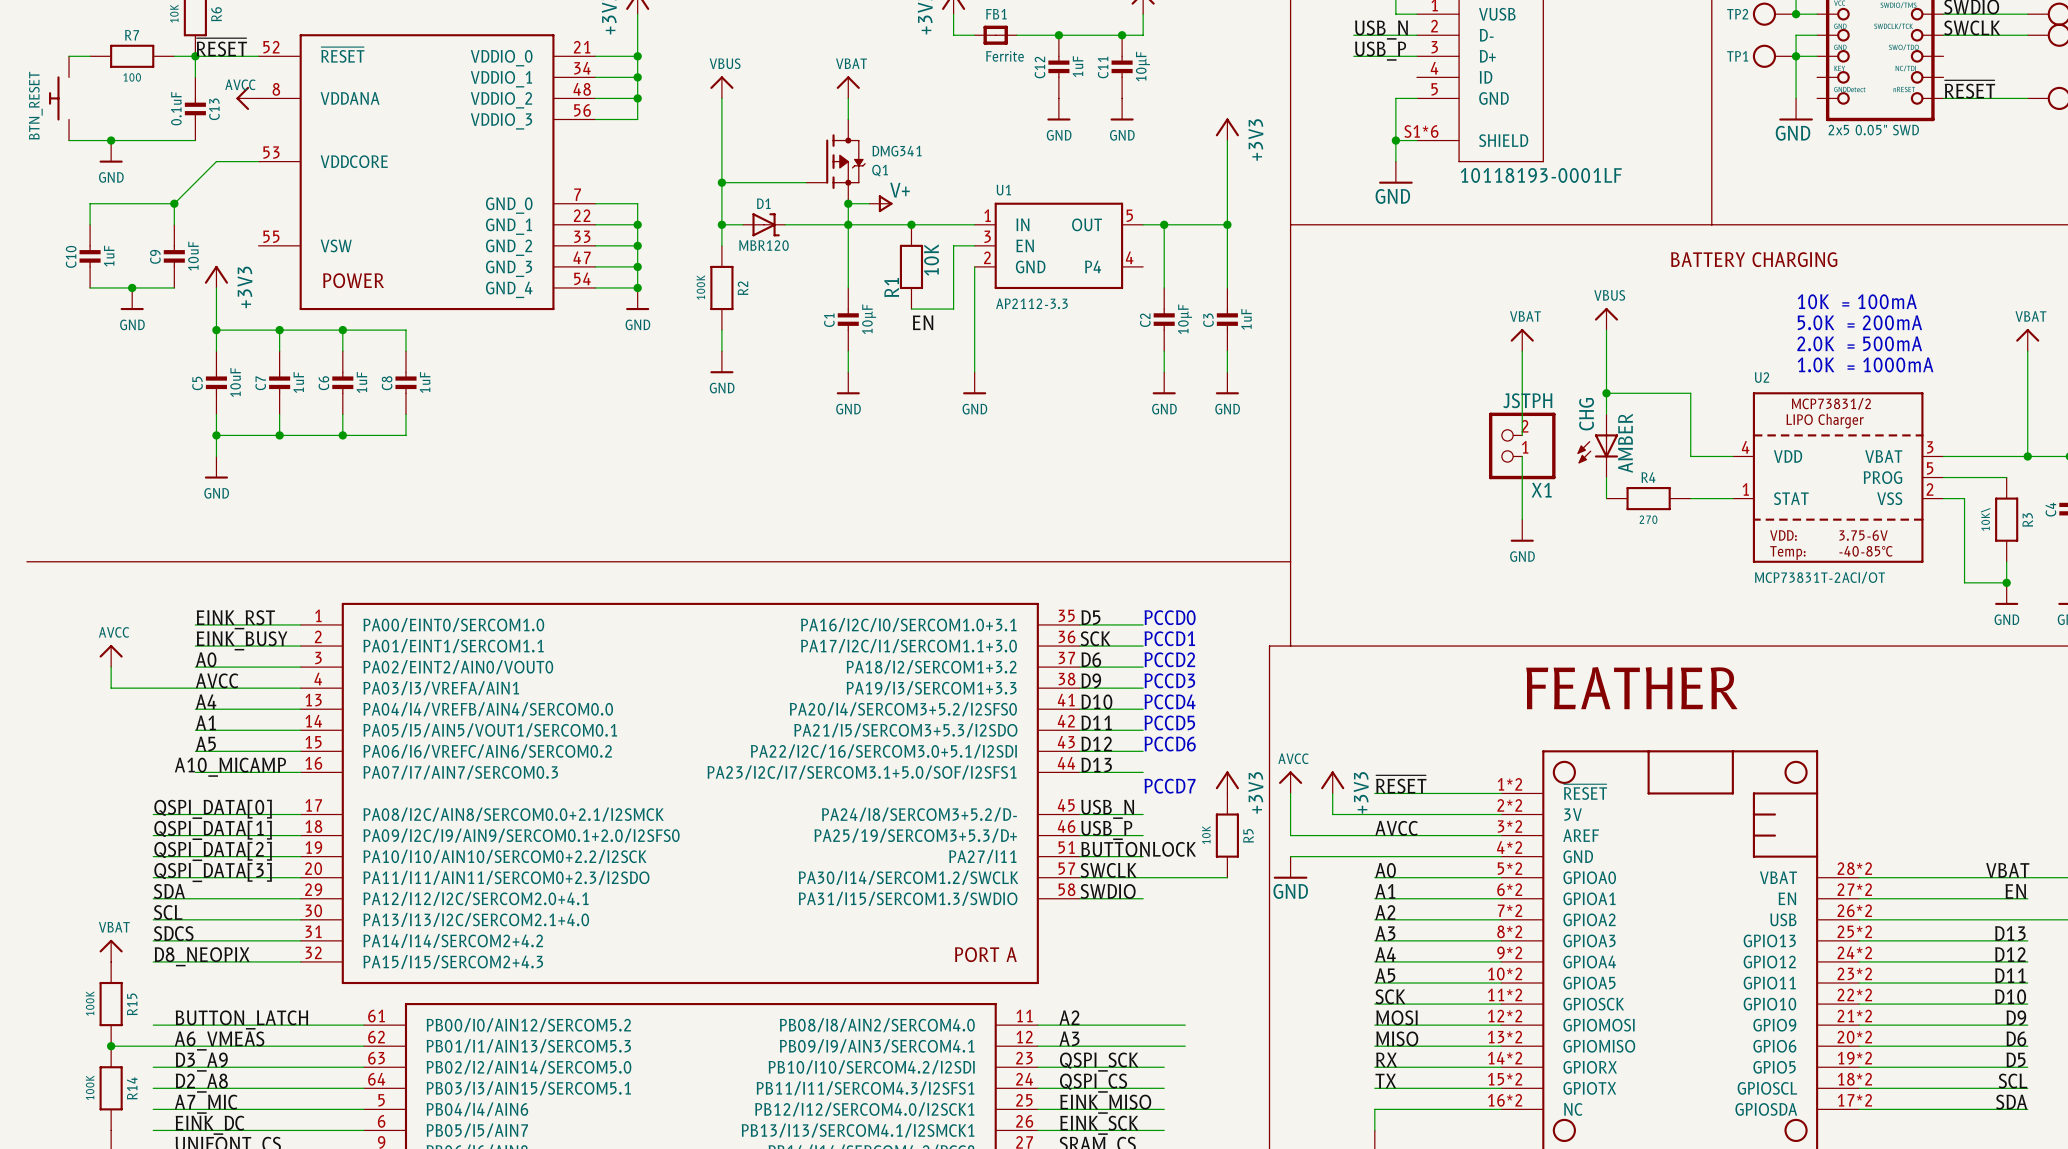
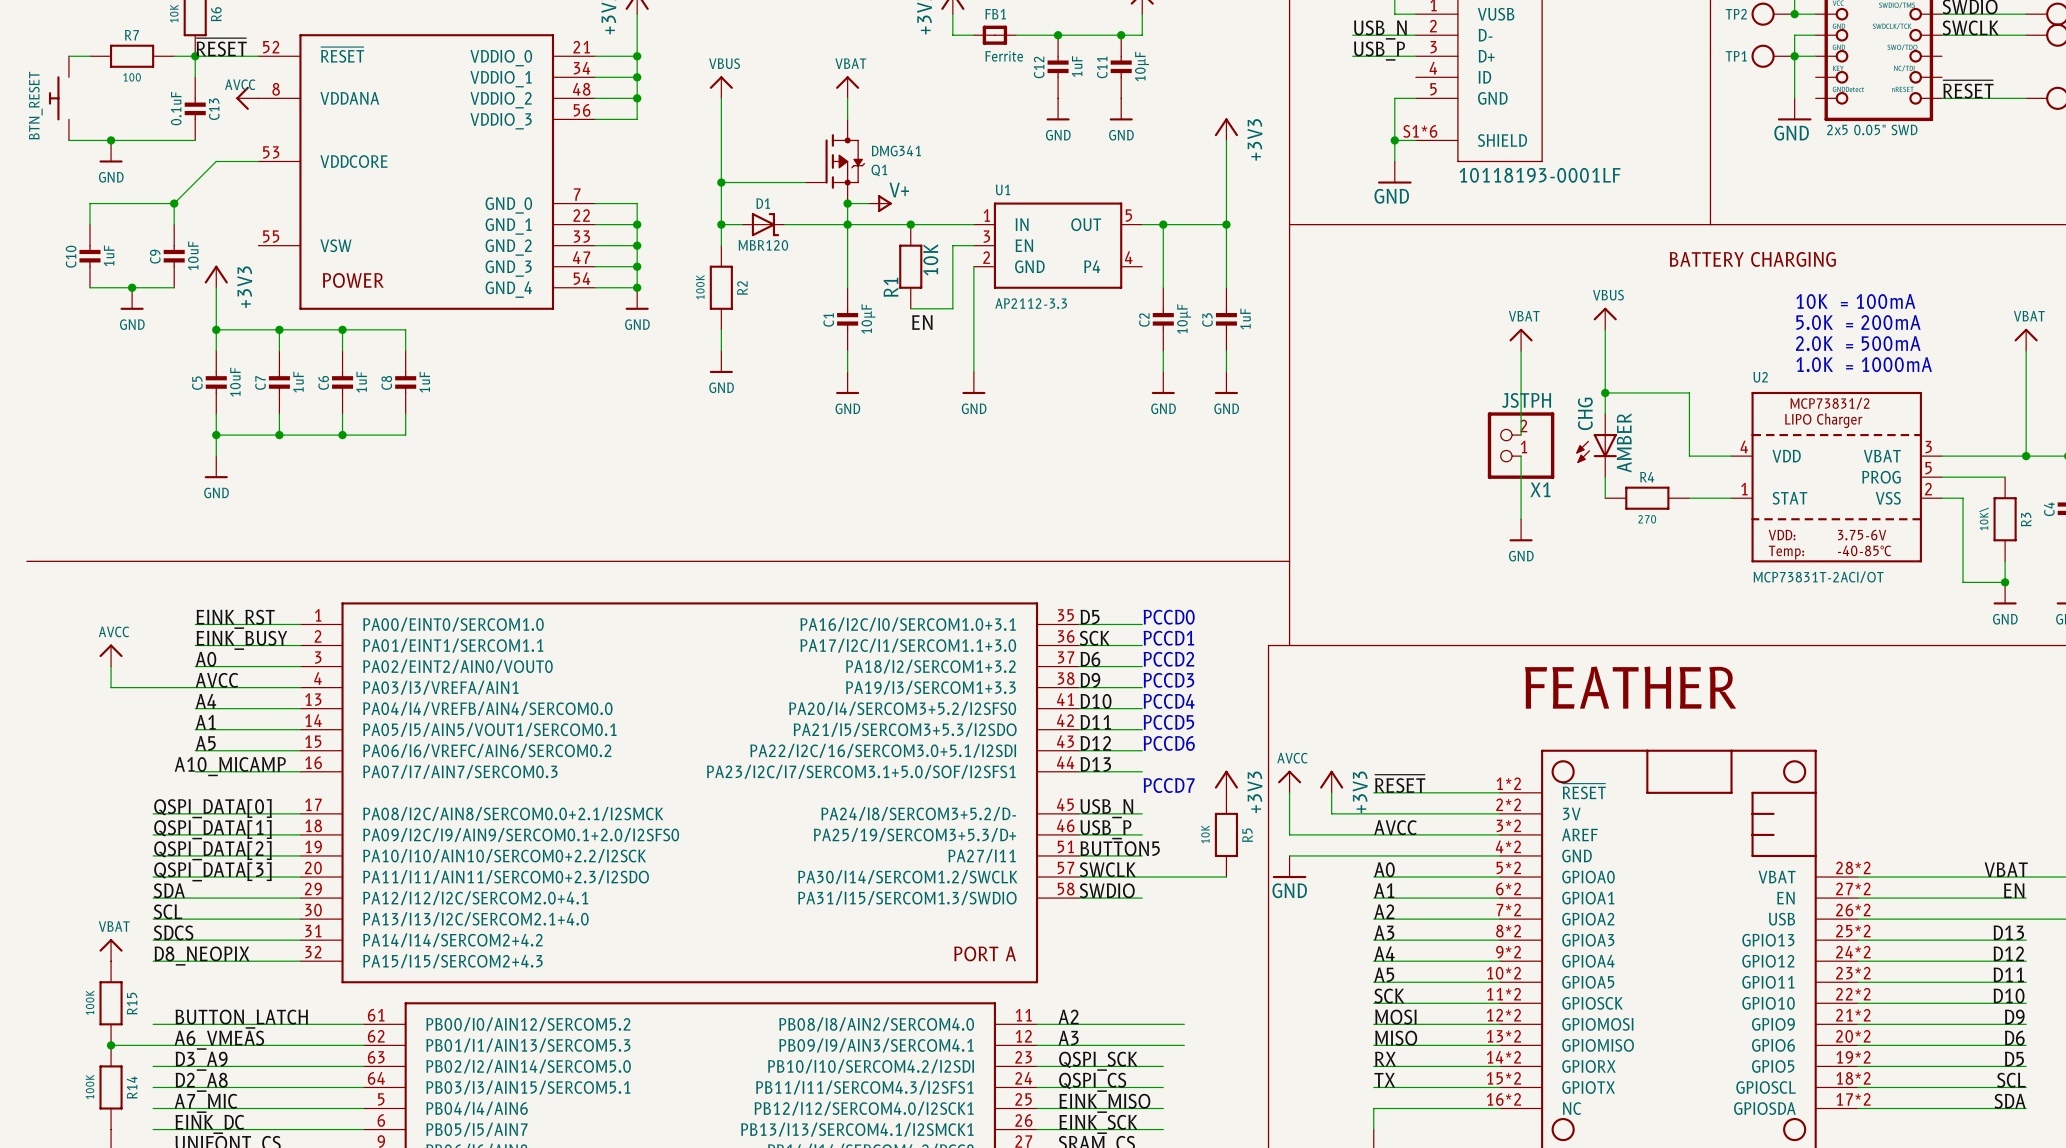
label: BUTTONLOCK (1138, 849) -> BUTTON5 (1120, 848)

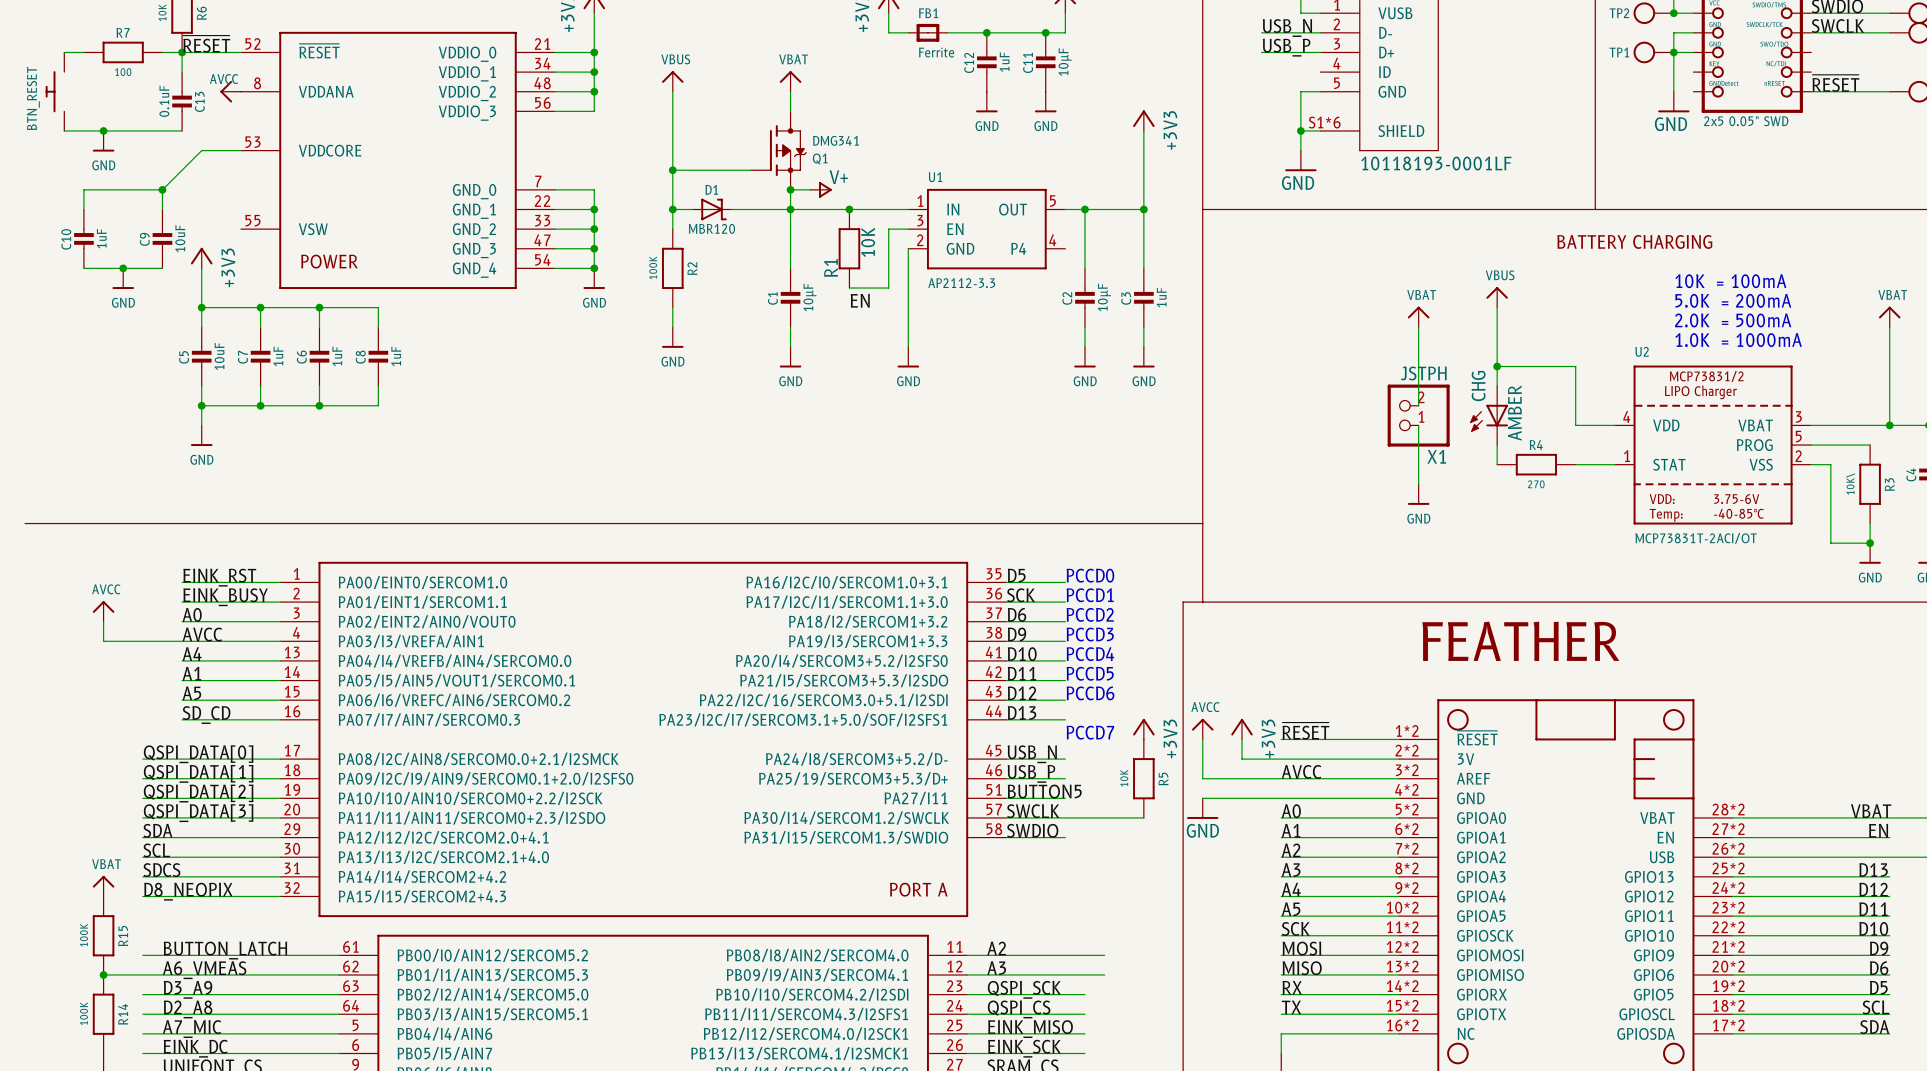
label: none -> SD_CD (206, 715)
label: A10_MICAMP (230, 766) -> none

